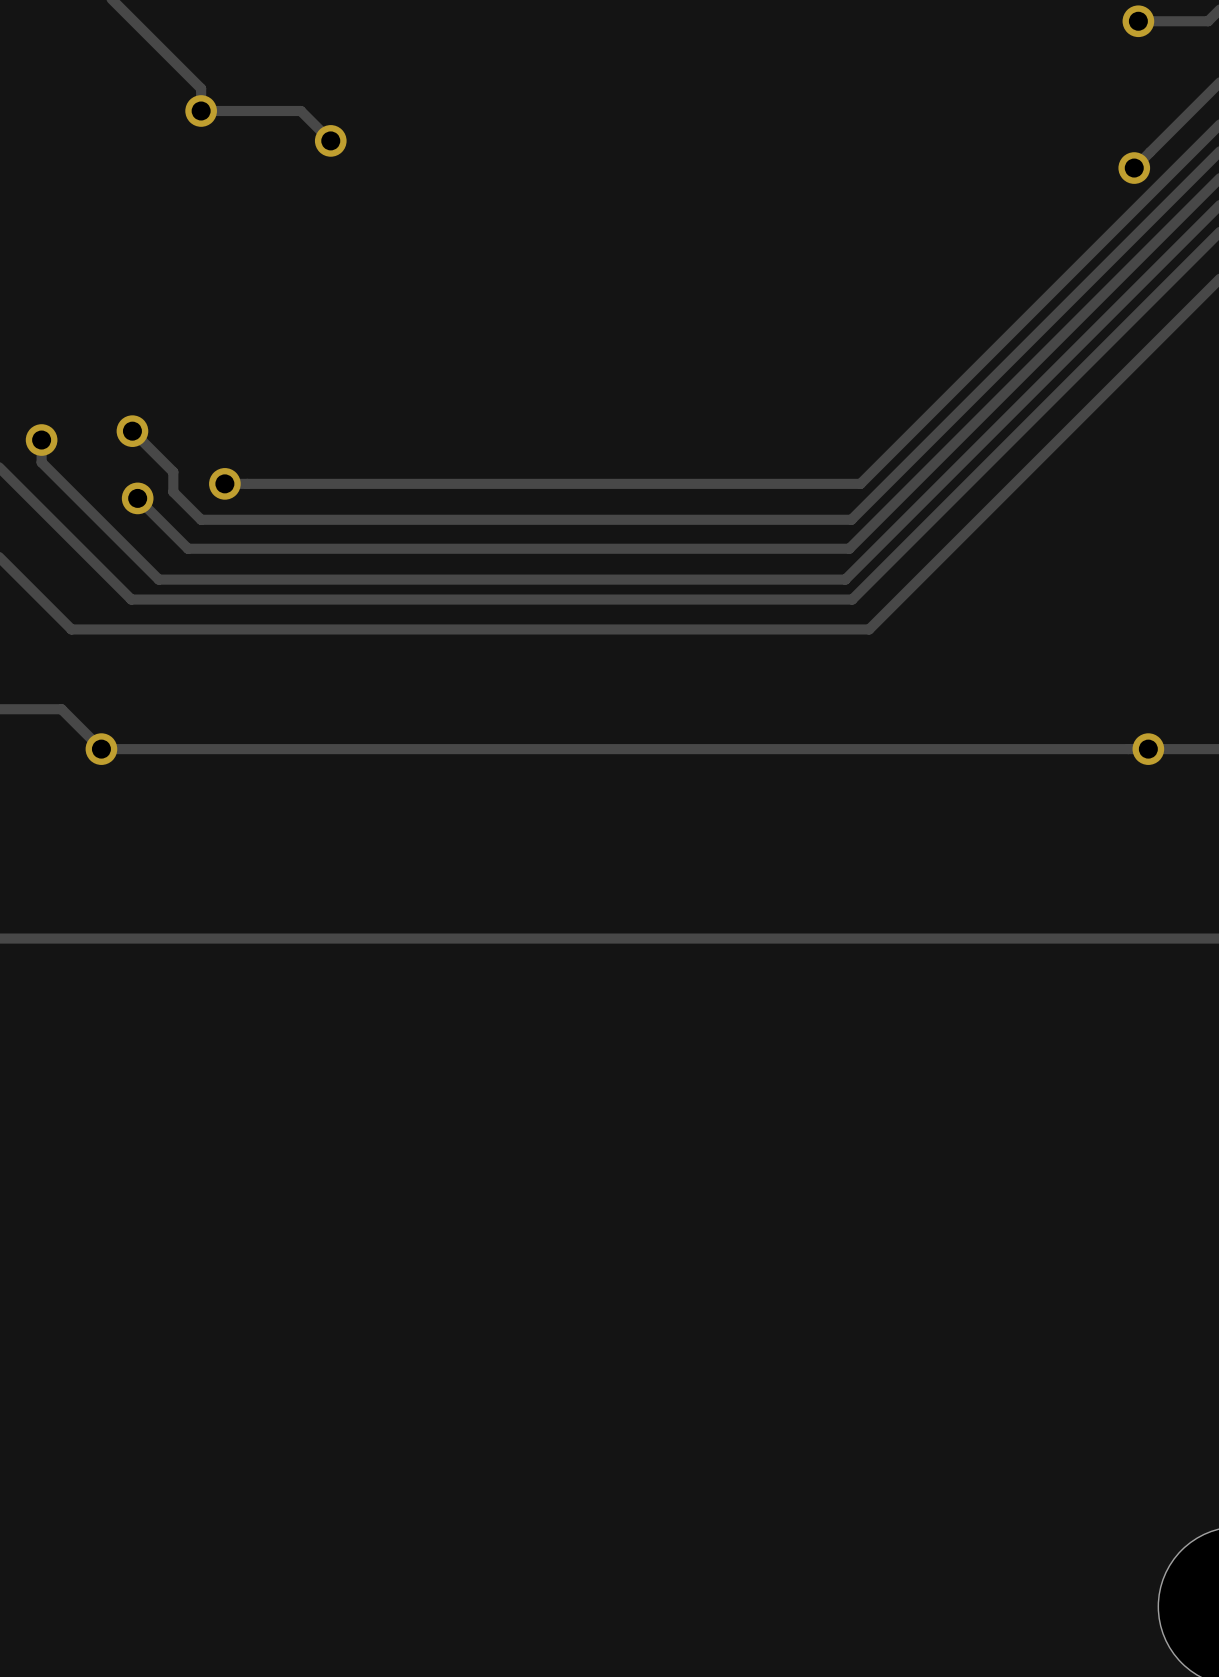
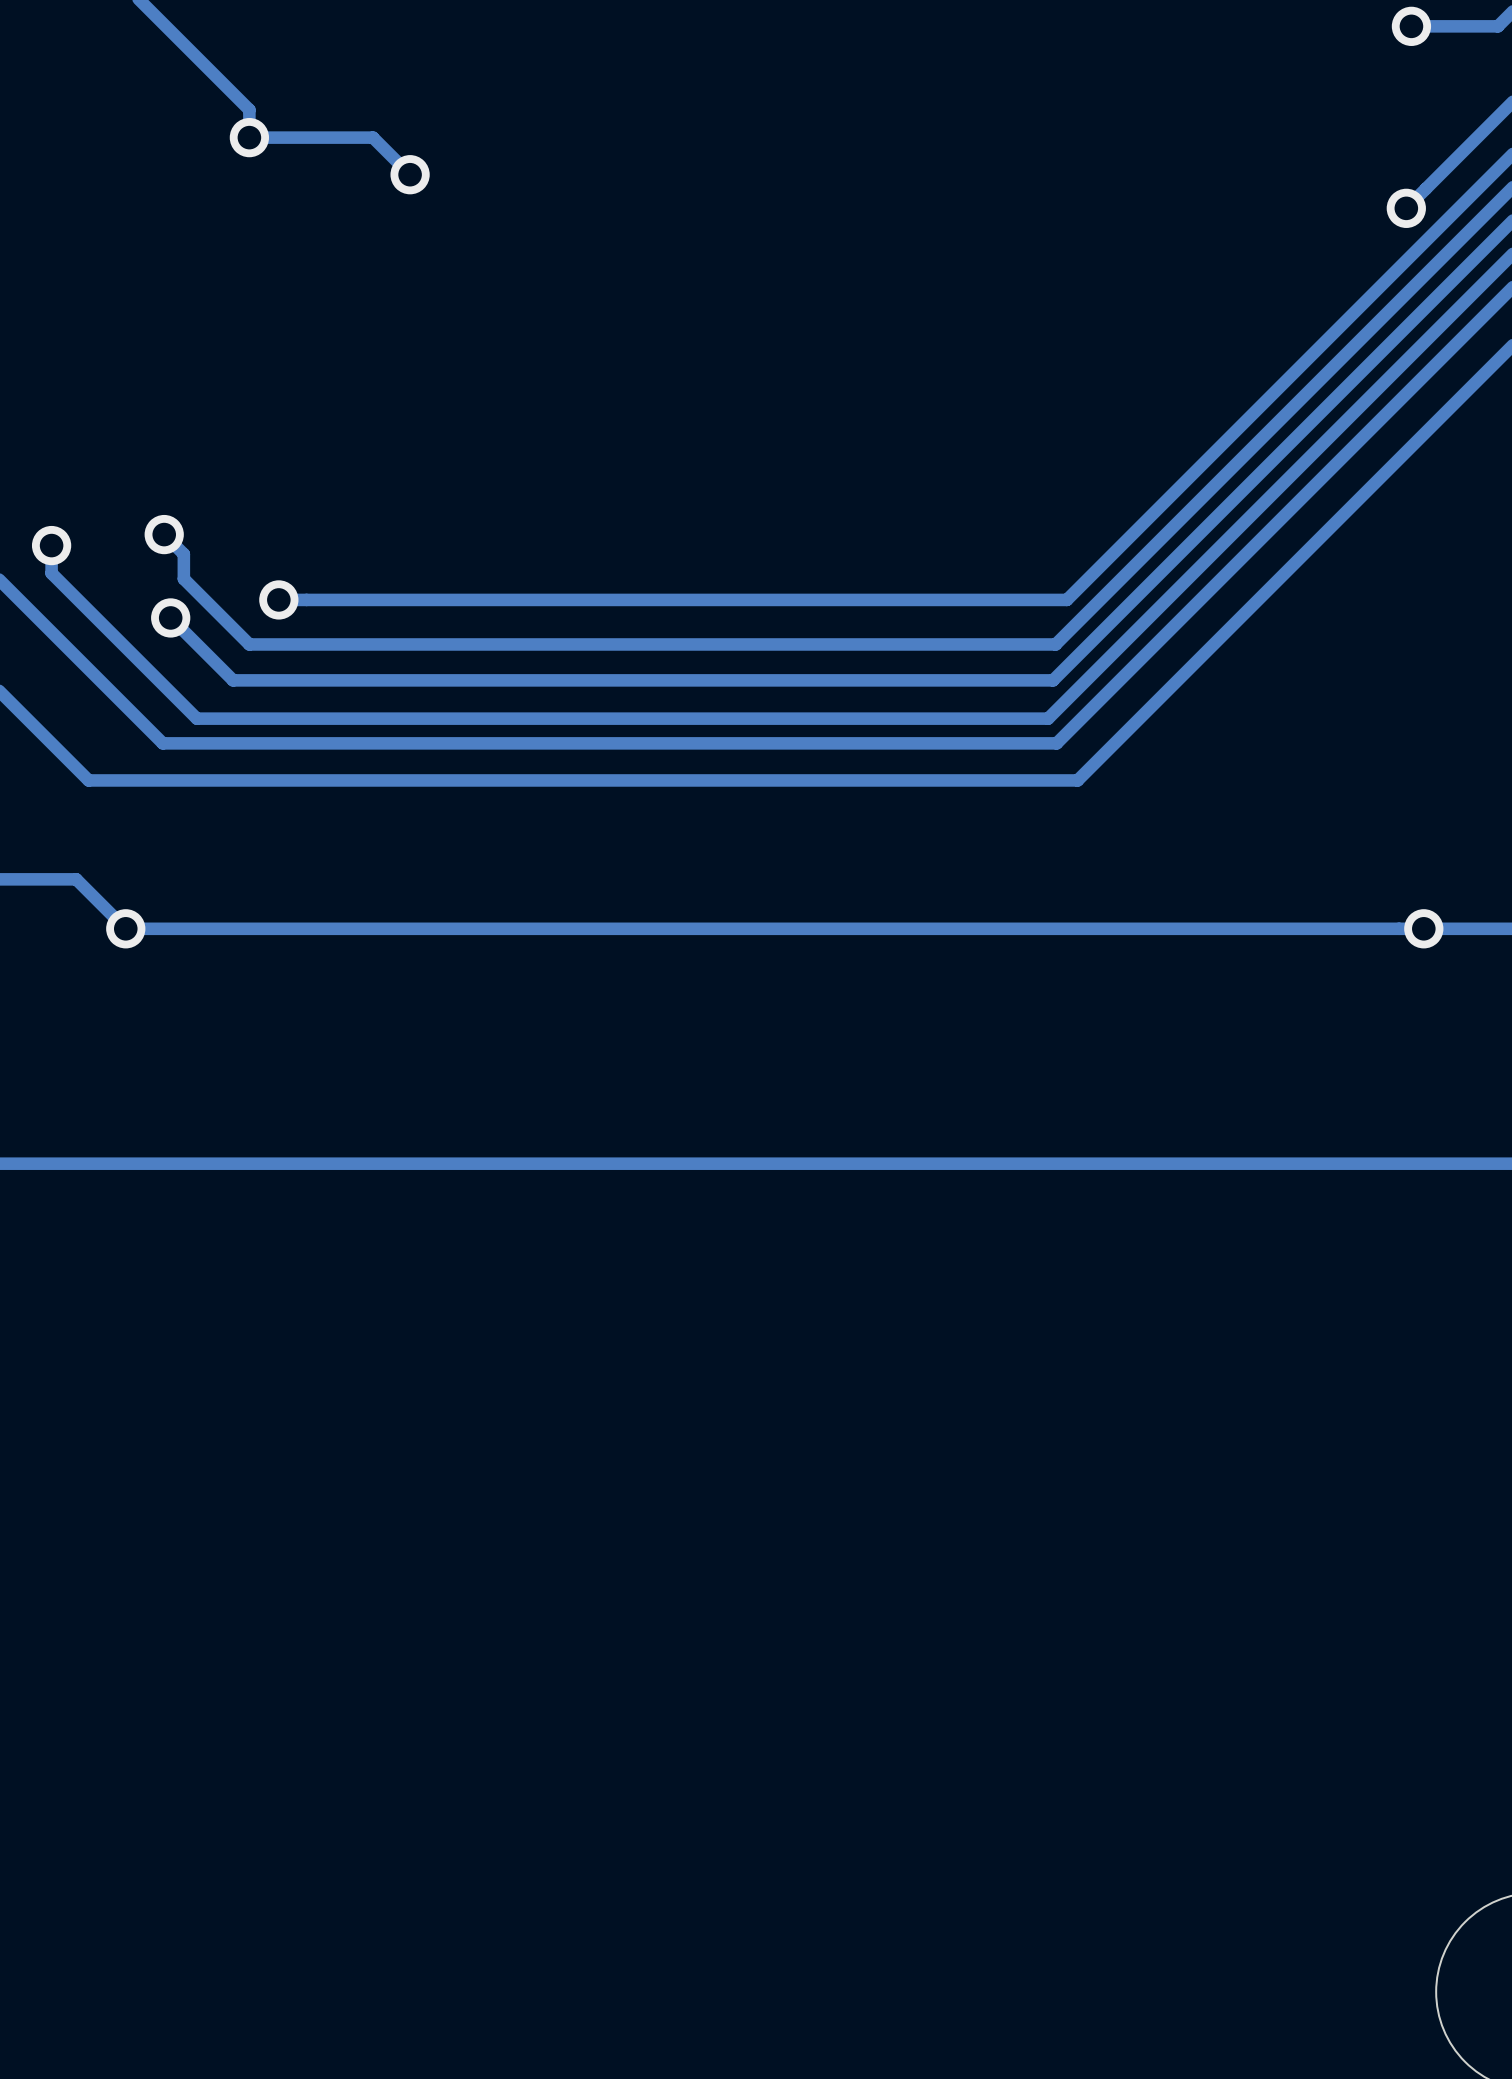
track: (148, 446) (173, 472) (173, 491) -> (183, 554) (183, 578) (214, 609)

